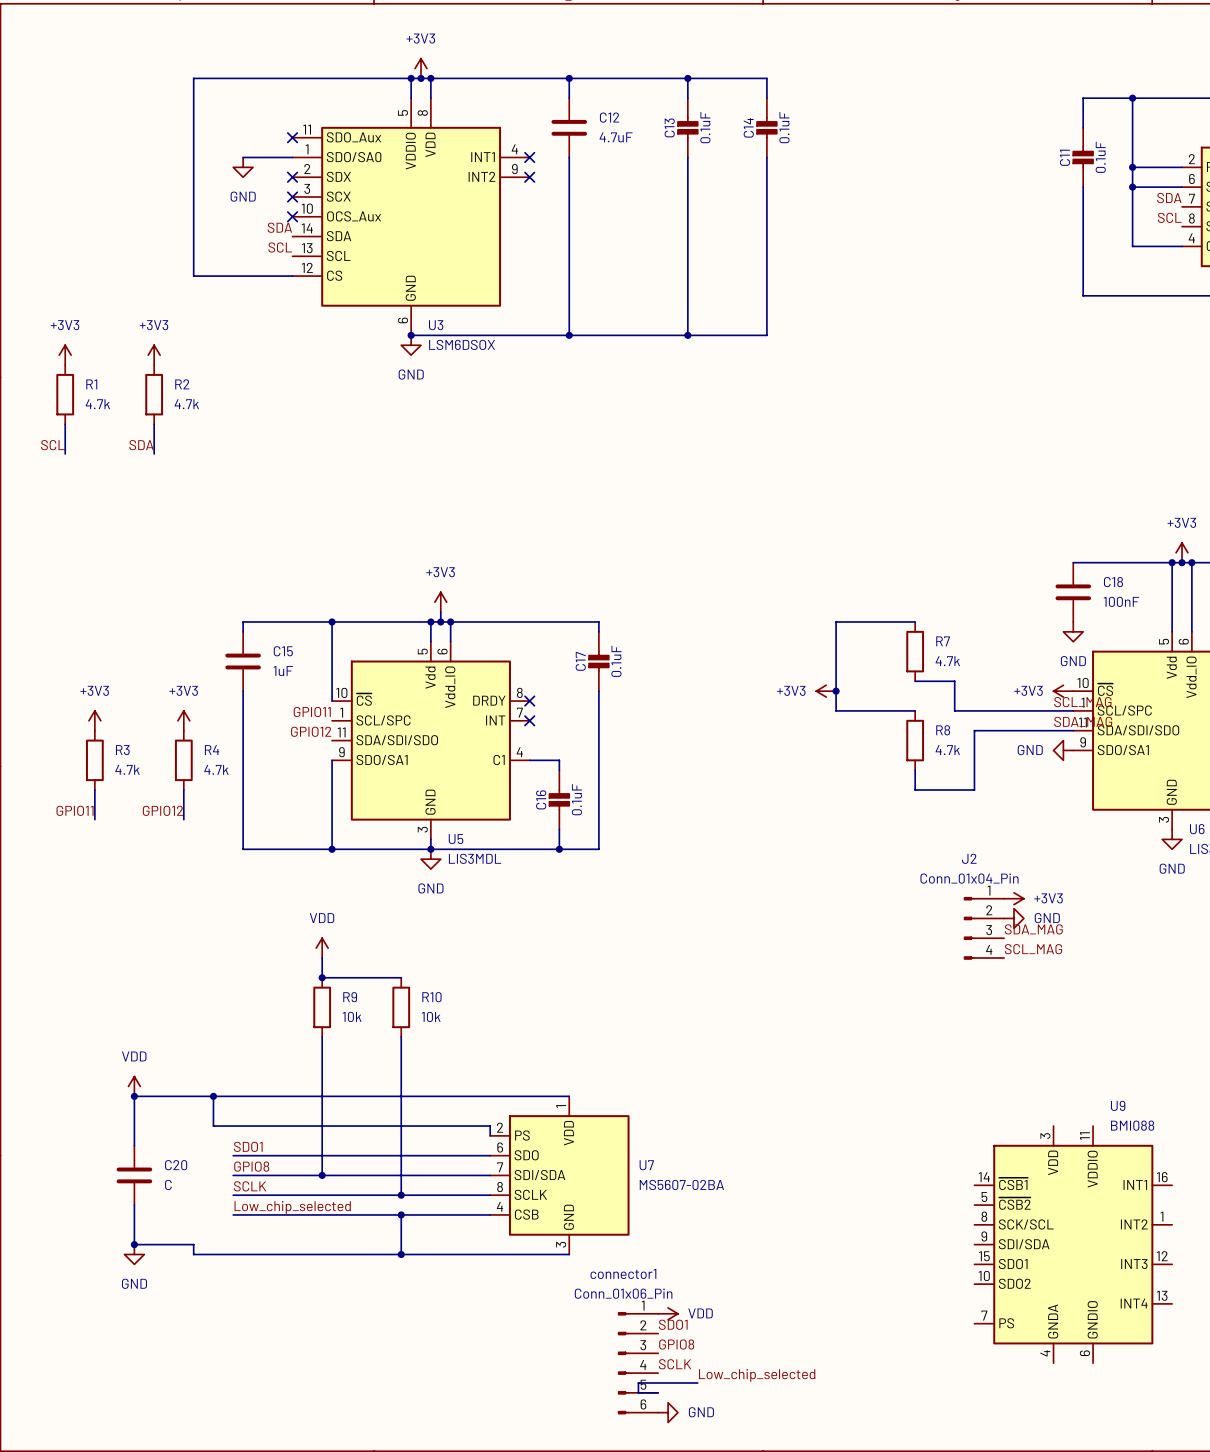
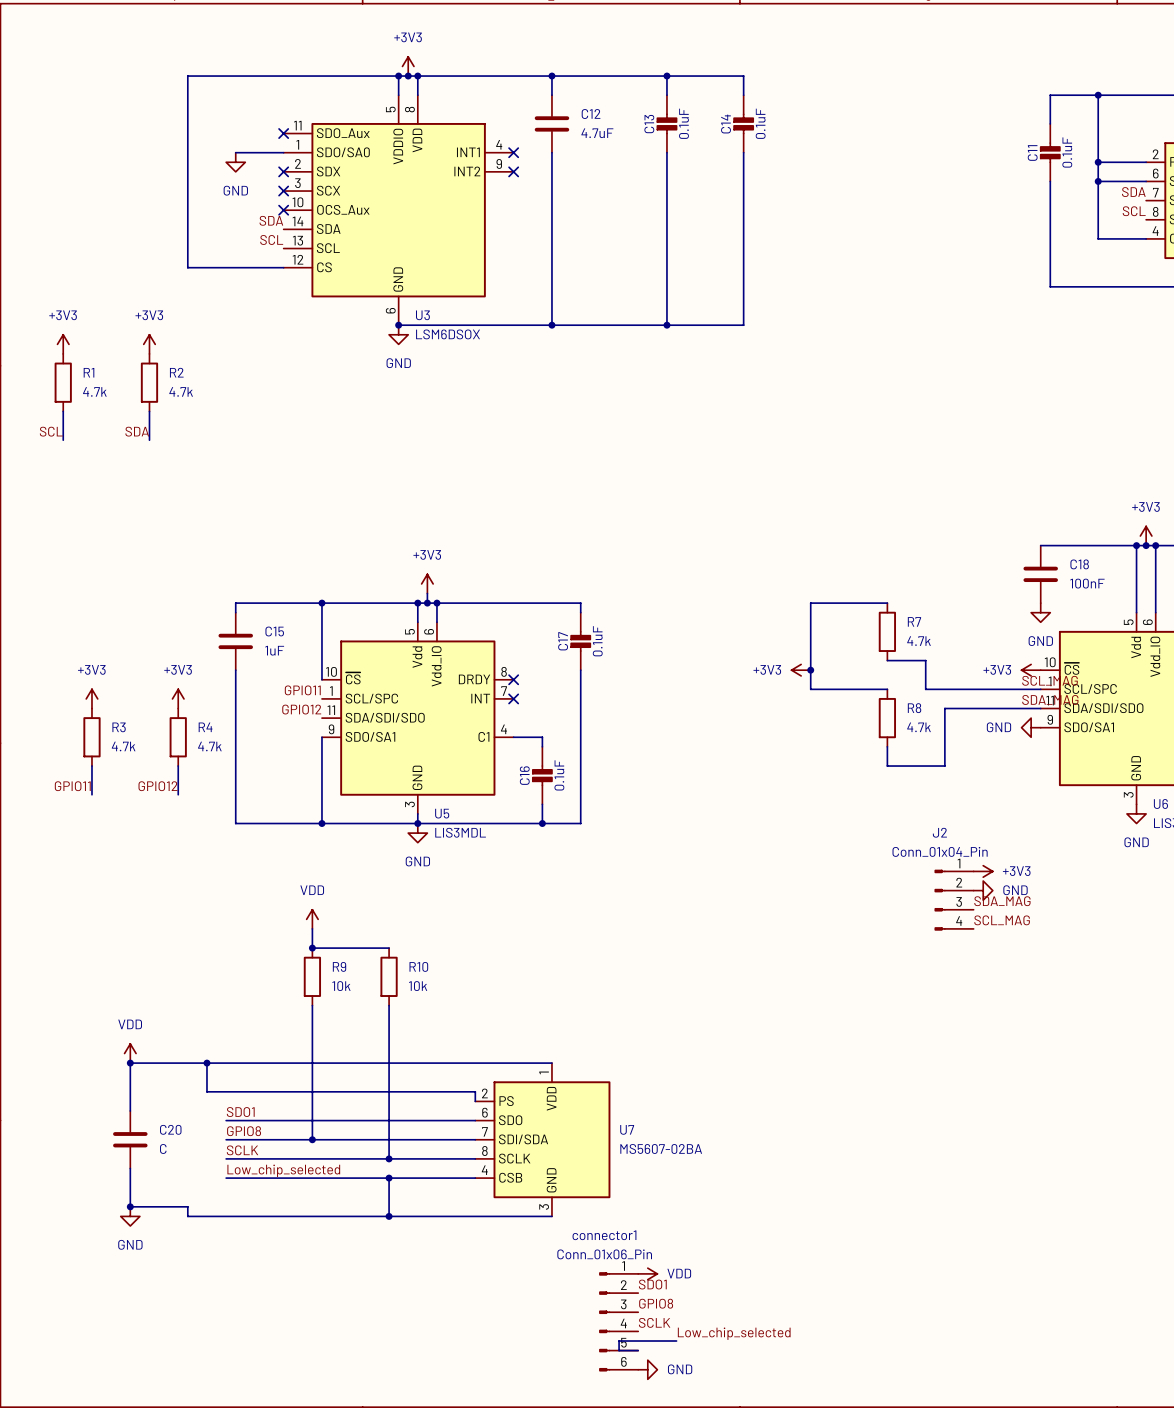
U9: BMI088 (1073, 1244) -> none

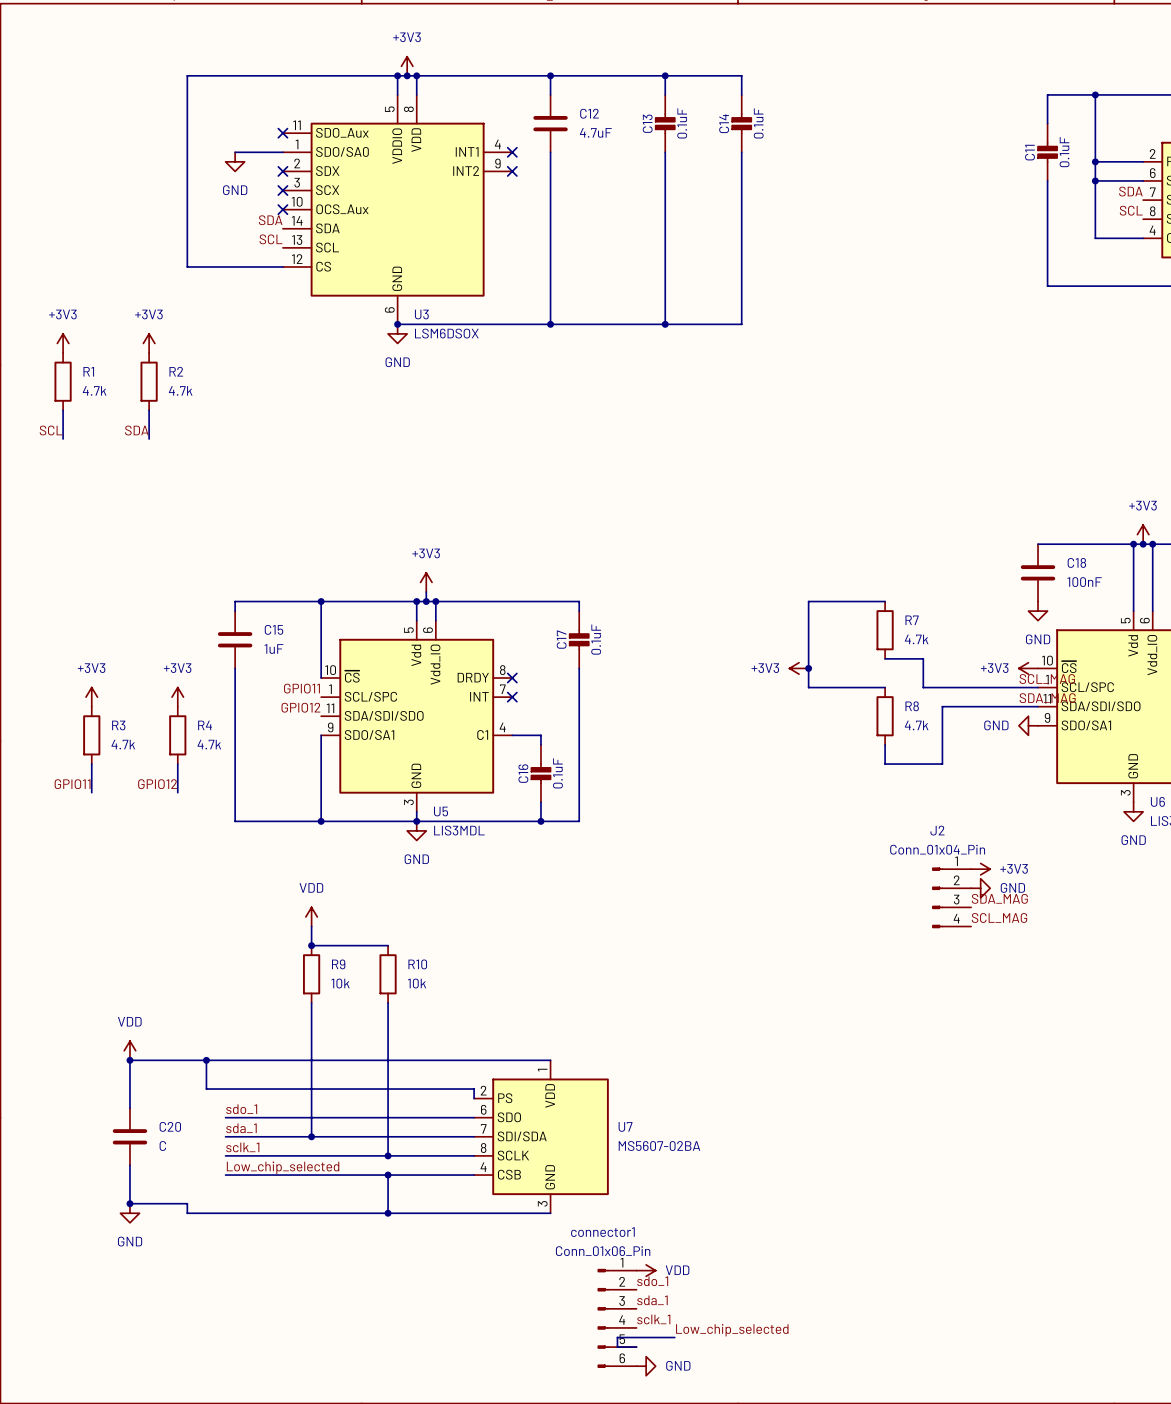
label: SDO1 (240, 1112) -> sdo_1 (241, 1109)
label: GPIO8 (244, 1131) -> sda_1 (241, 1128)
label: SCLK (242, 1150) -> sclk_1 (242, 1147)
label: SDO1 (652, 1284) -> sdo_1 (652, 1281)
label: GPIO8 (656, 1303) -> sda_1 (652, 1300)
label: SCLK (654, 1322) -> sclk_1 (653, 1319)

